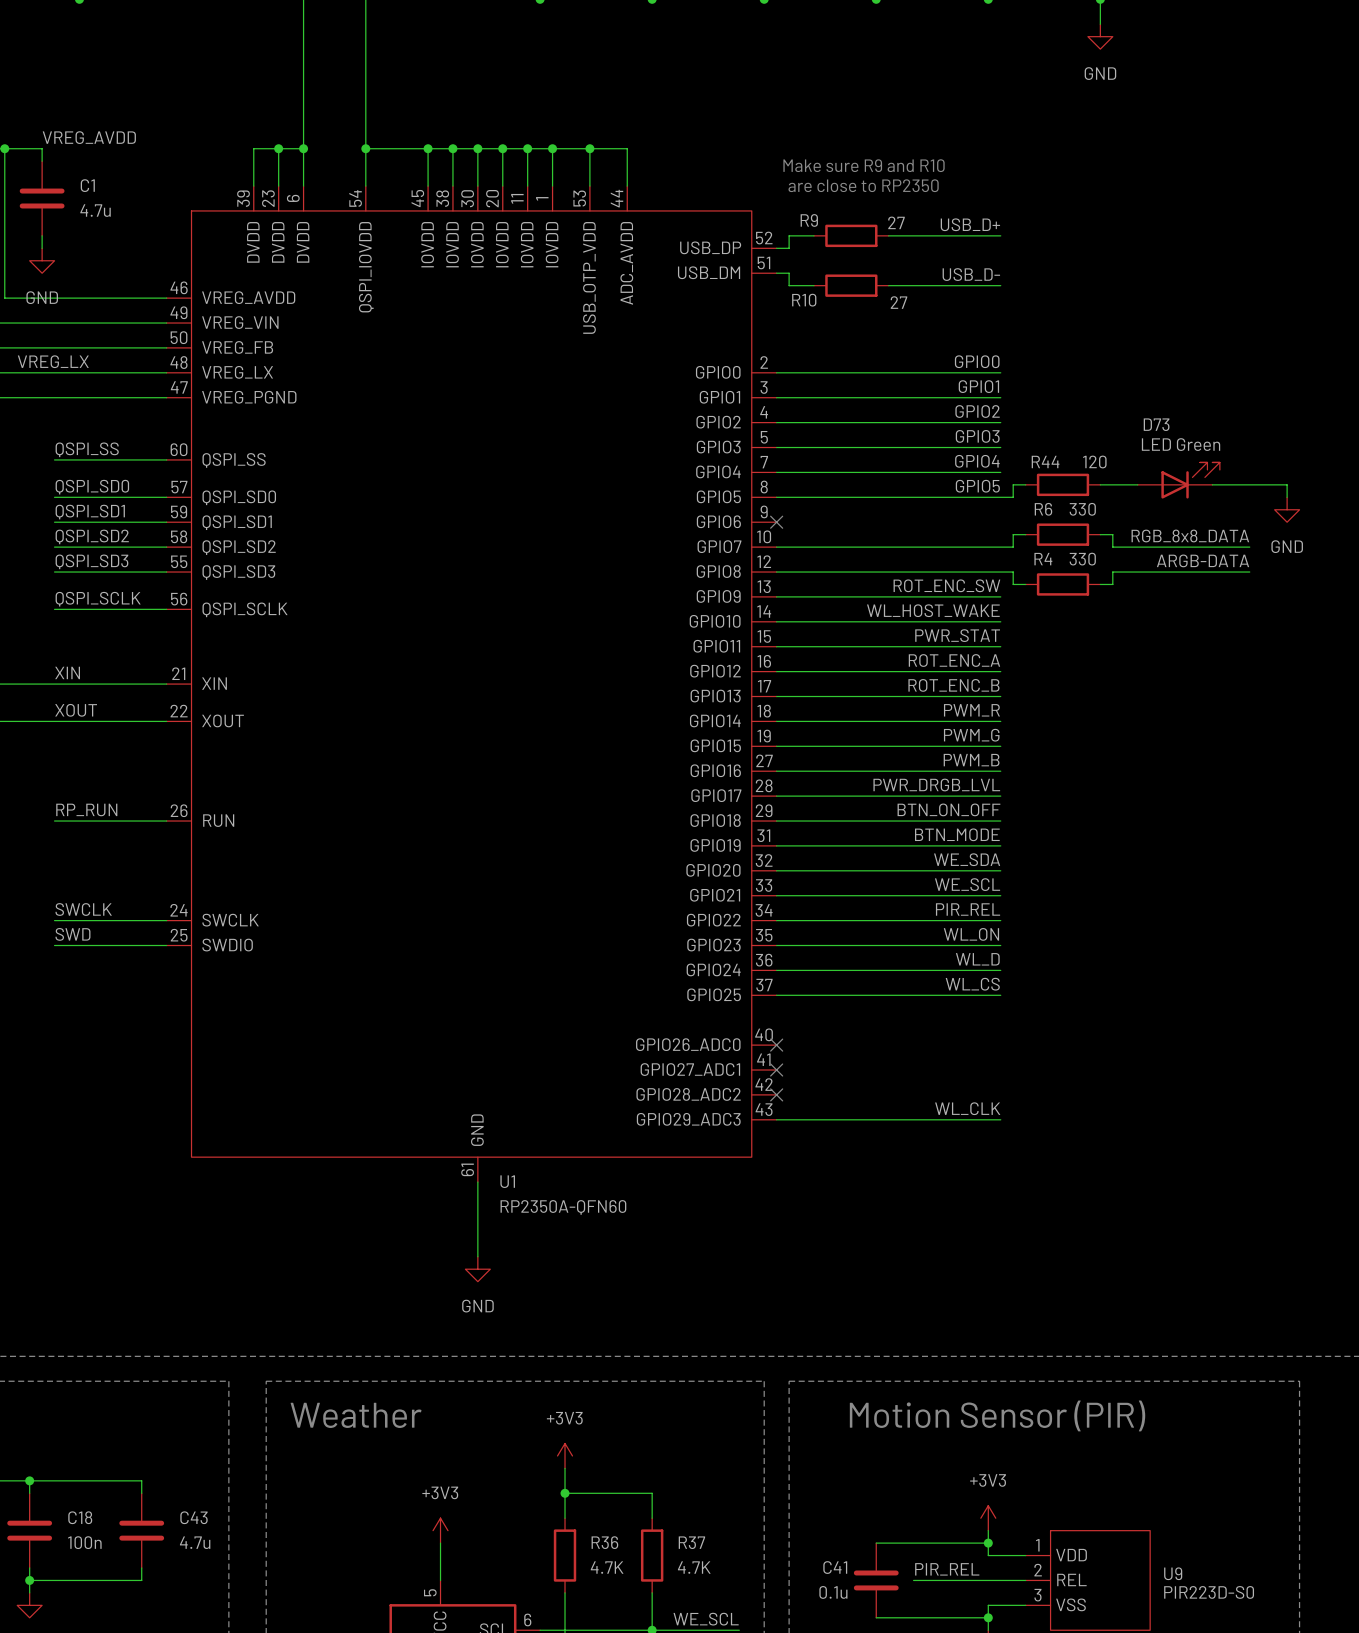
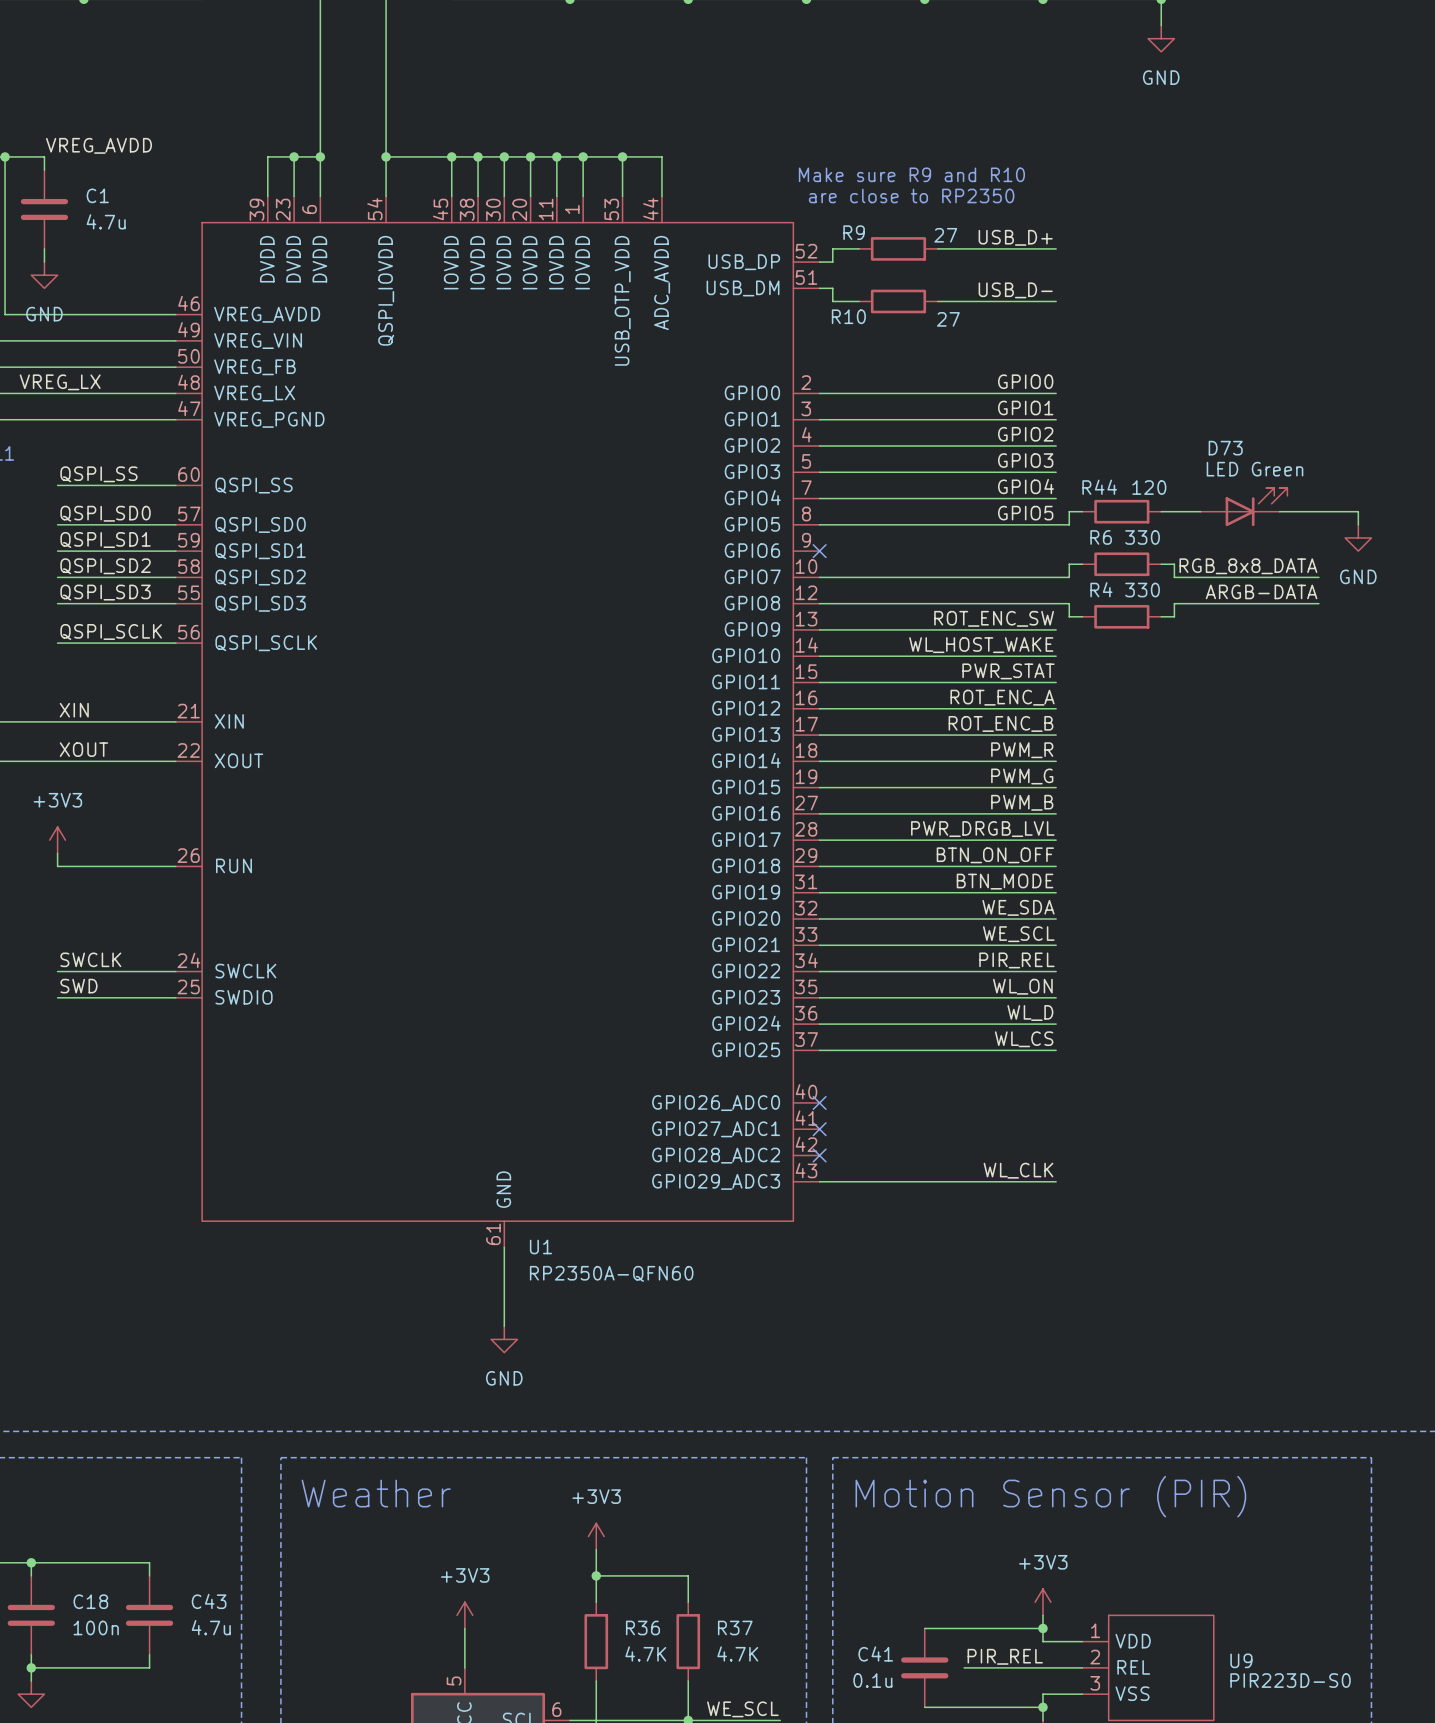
power symbol: none -> +3V3 (57, 840)
wire: none -> (57, 853) (57, 866)
label: RP_RUN (86, 809) -> none

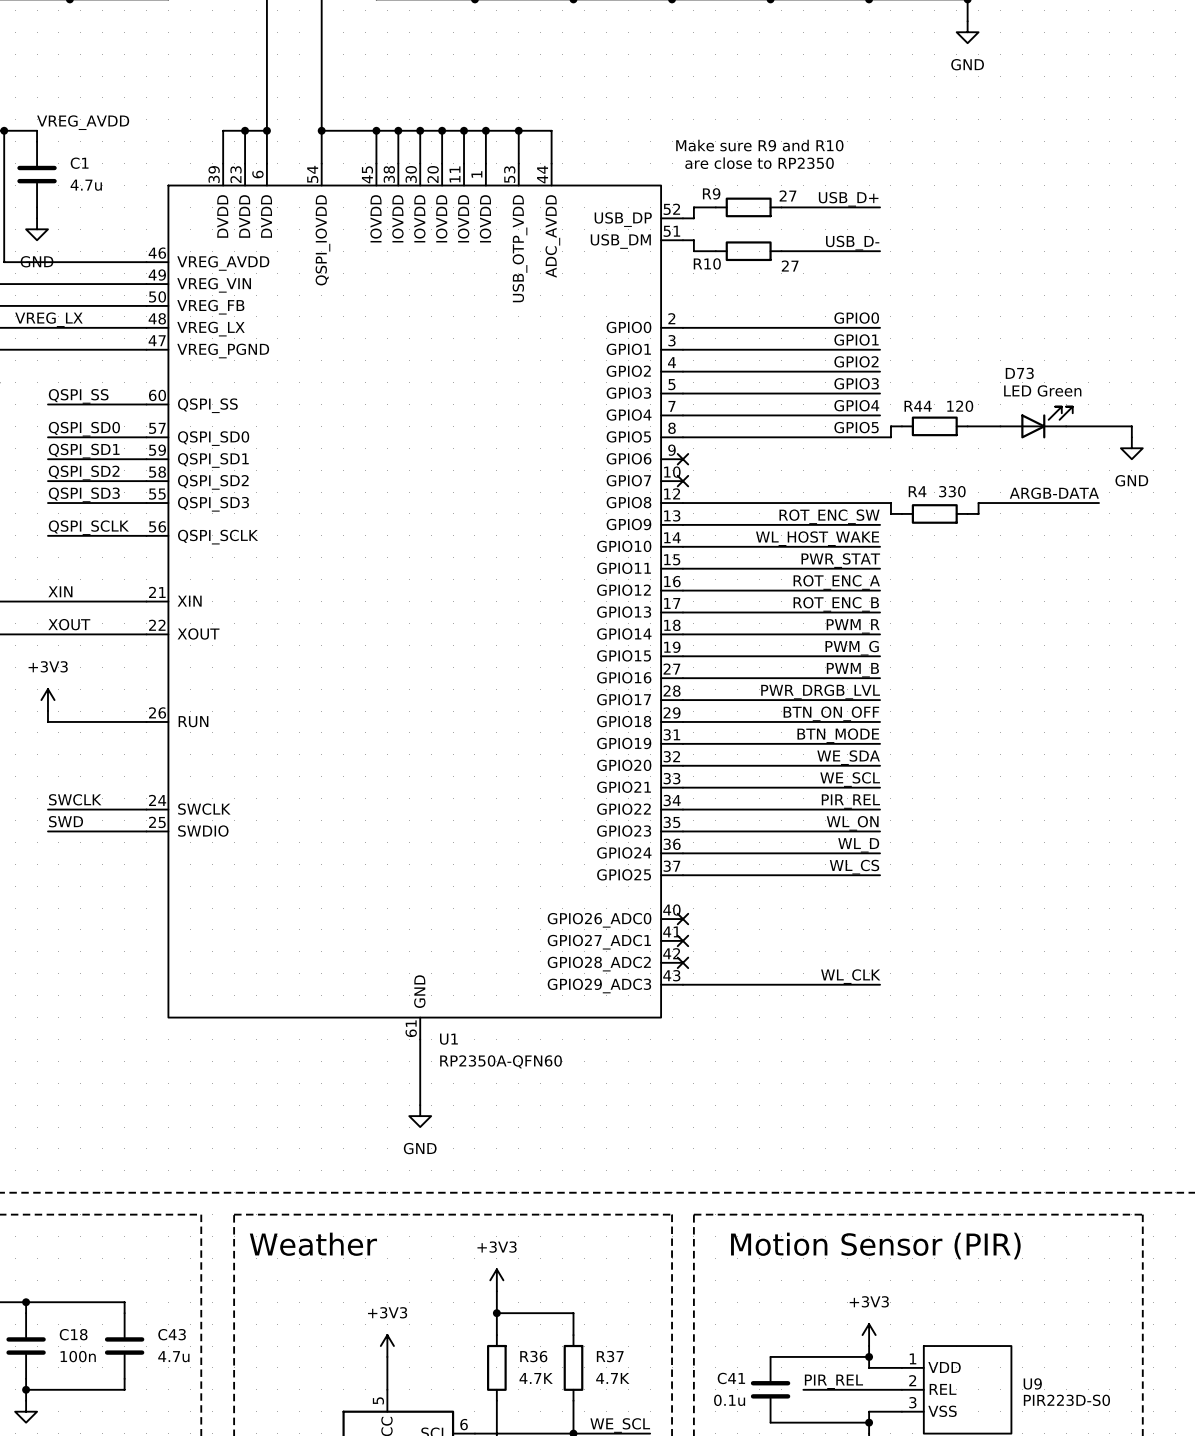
wire: (1082, 564) (1069, 564) (1069, 577) (819, 577) -> none
R6: 330 (1121, 564) -> none
wire: (1161, 564) (1174, 564) (1174, 577) (1318, 577) -> none
label: RGB_8x8_DATA (1248, 566) -> none
no-connect mark: none -> (682, 481)

